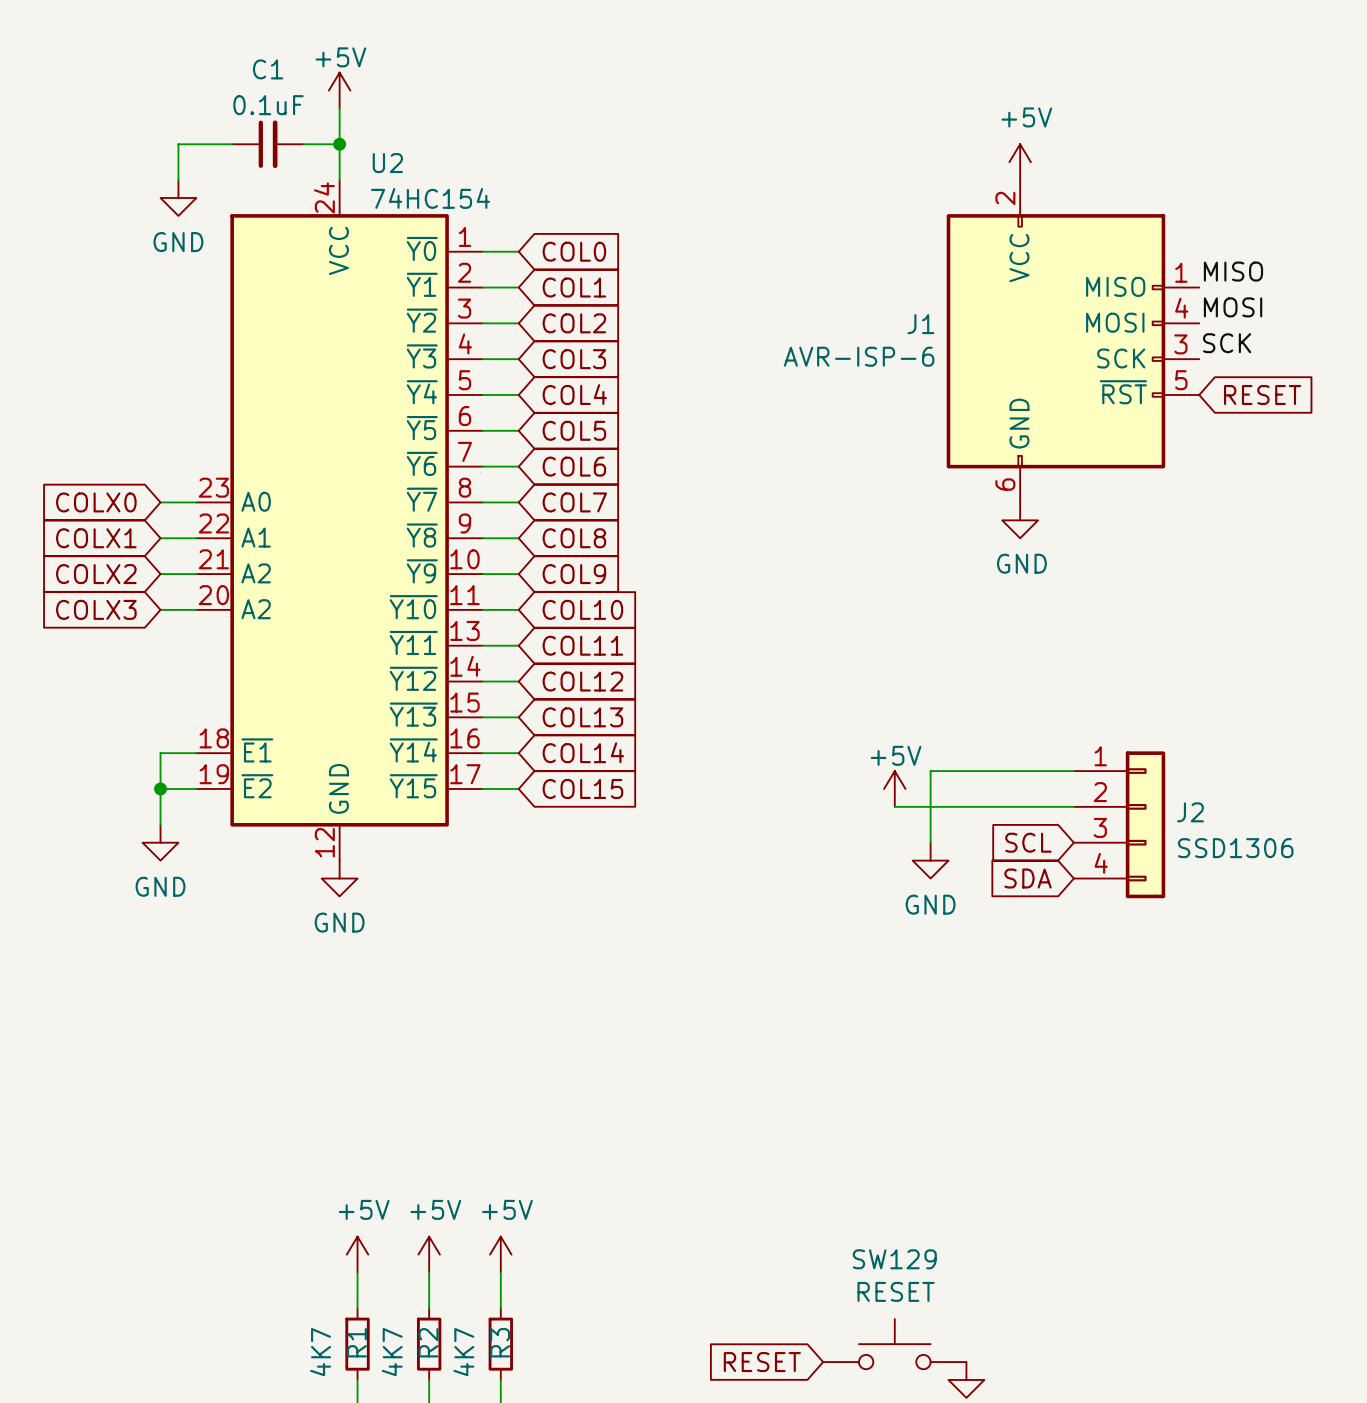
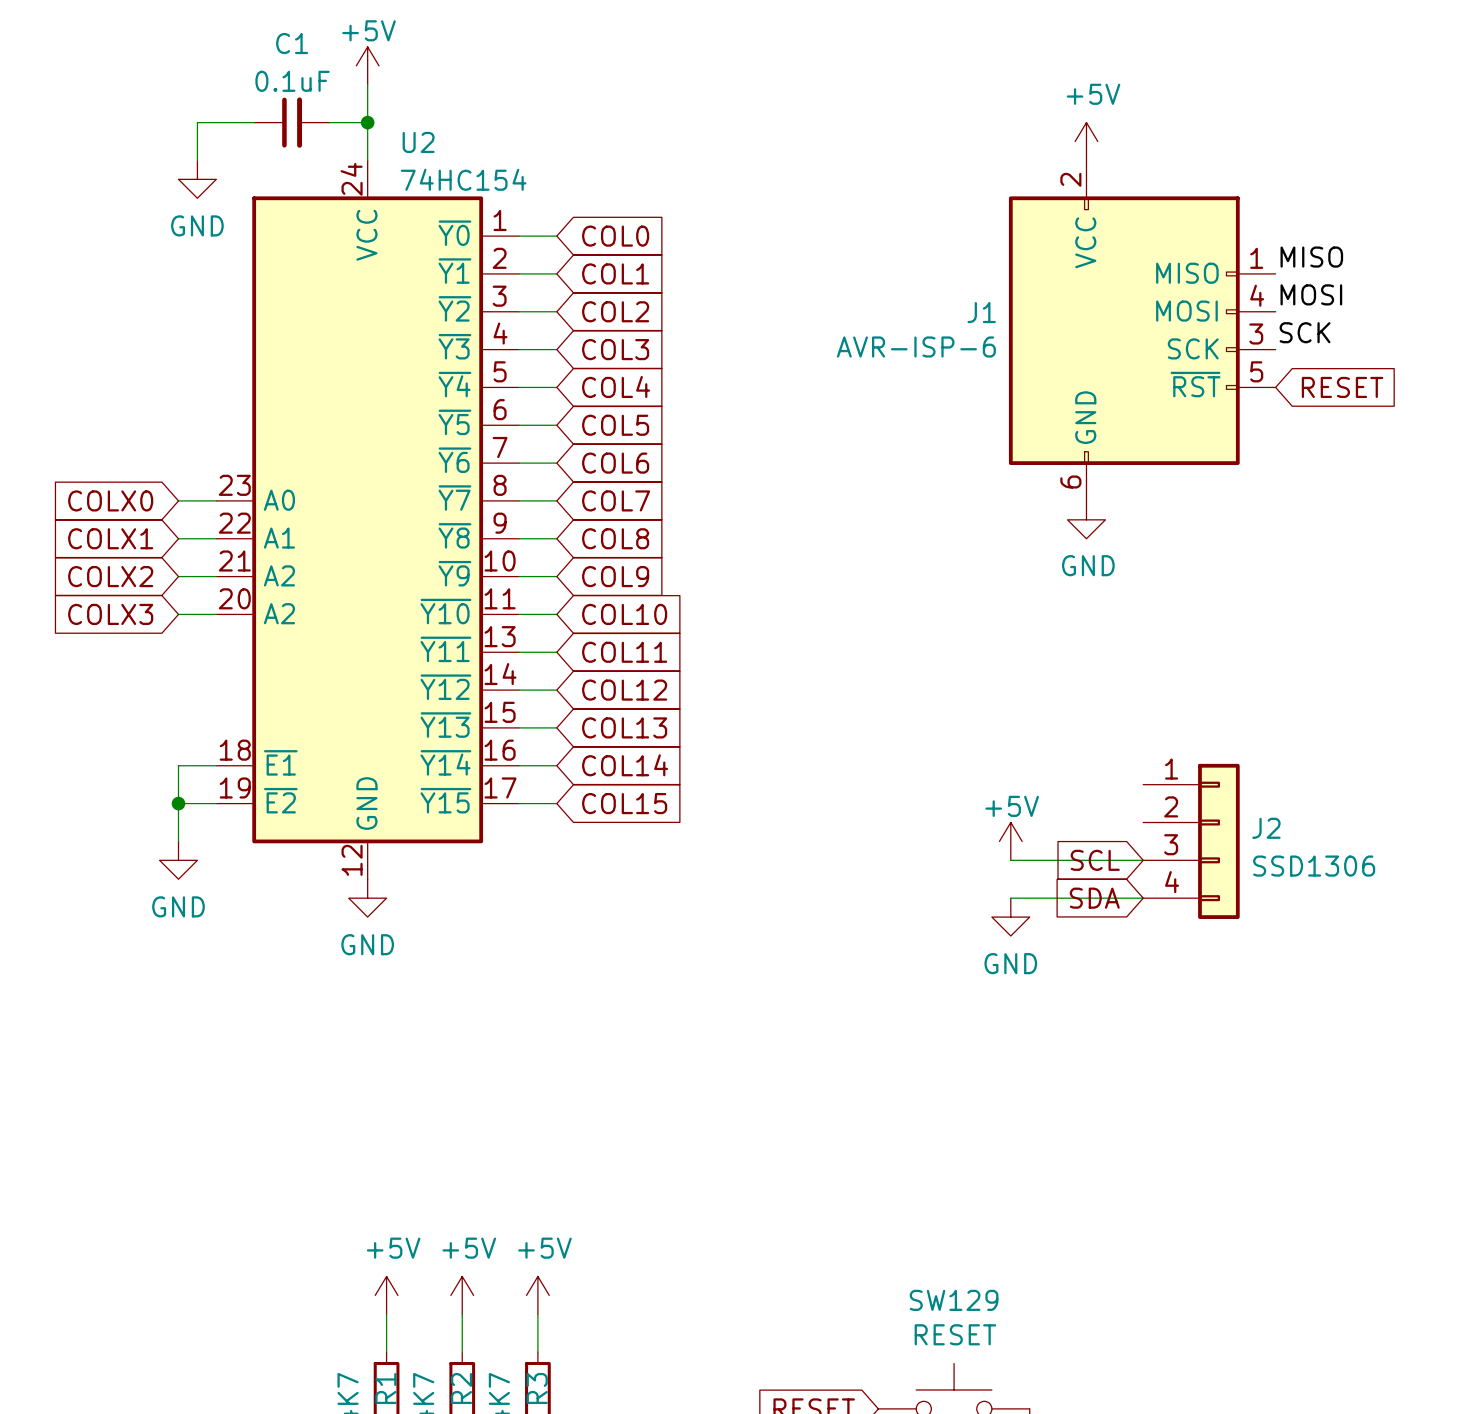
wire: (1073, 771) (930, 771) (930, 842) -> none
power symbol position: +5V (894, 788) -> +5V (1010, 841)
wire: (894, 806) (1073, 806) -> none
wire: none -> (1010, 860) (1143, 860)
power symbol position: GND (930, 860) -> GND (1010, 917)
wire: none -> (1010, 898) (1143, 898)

